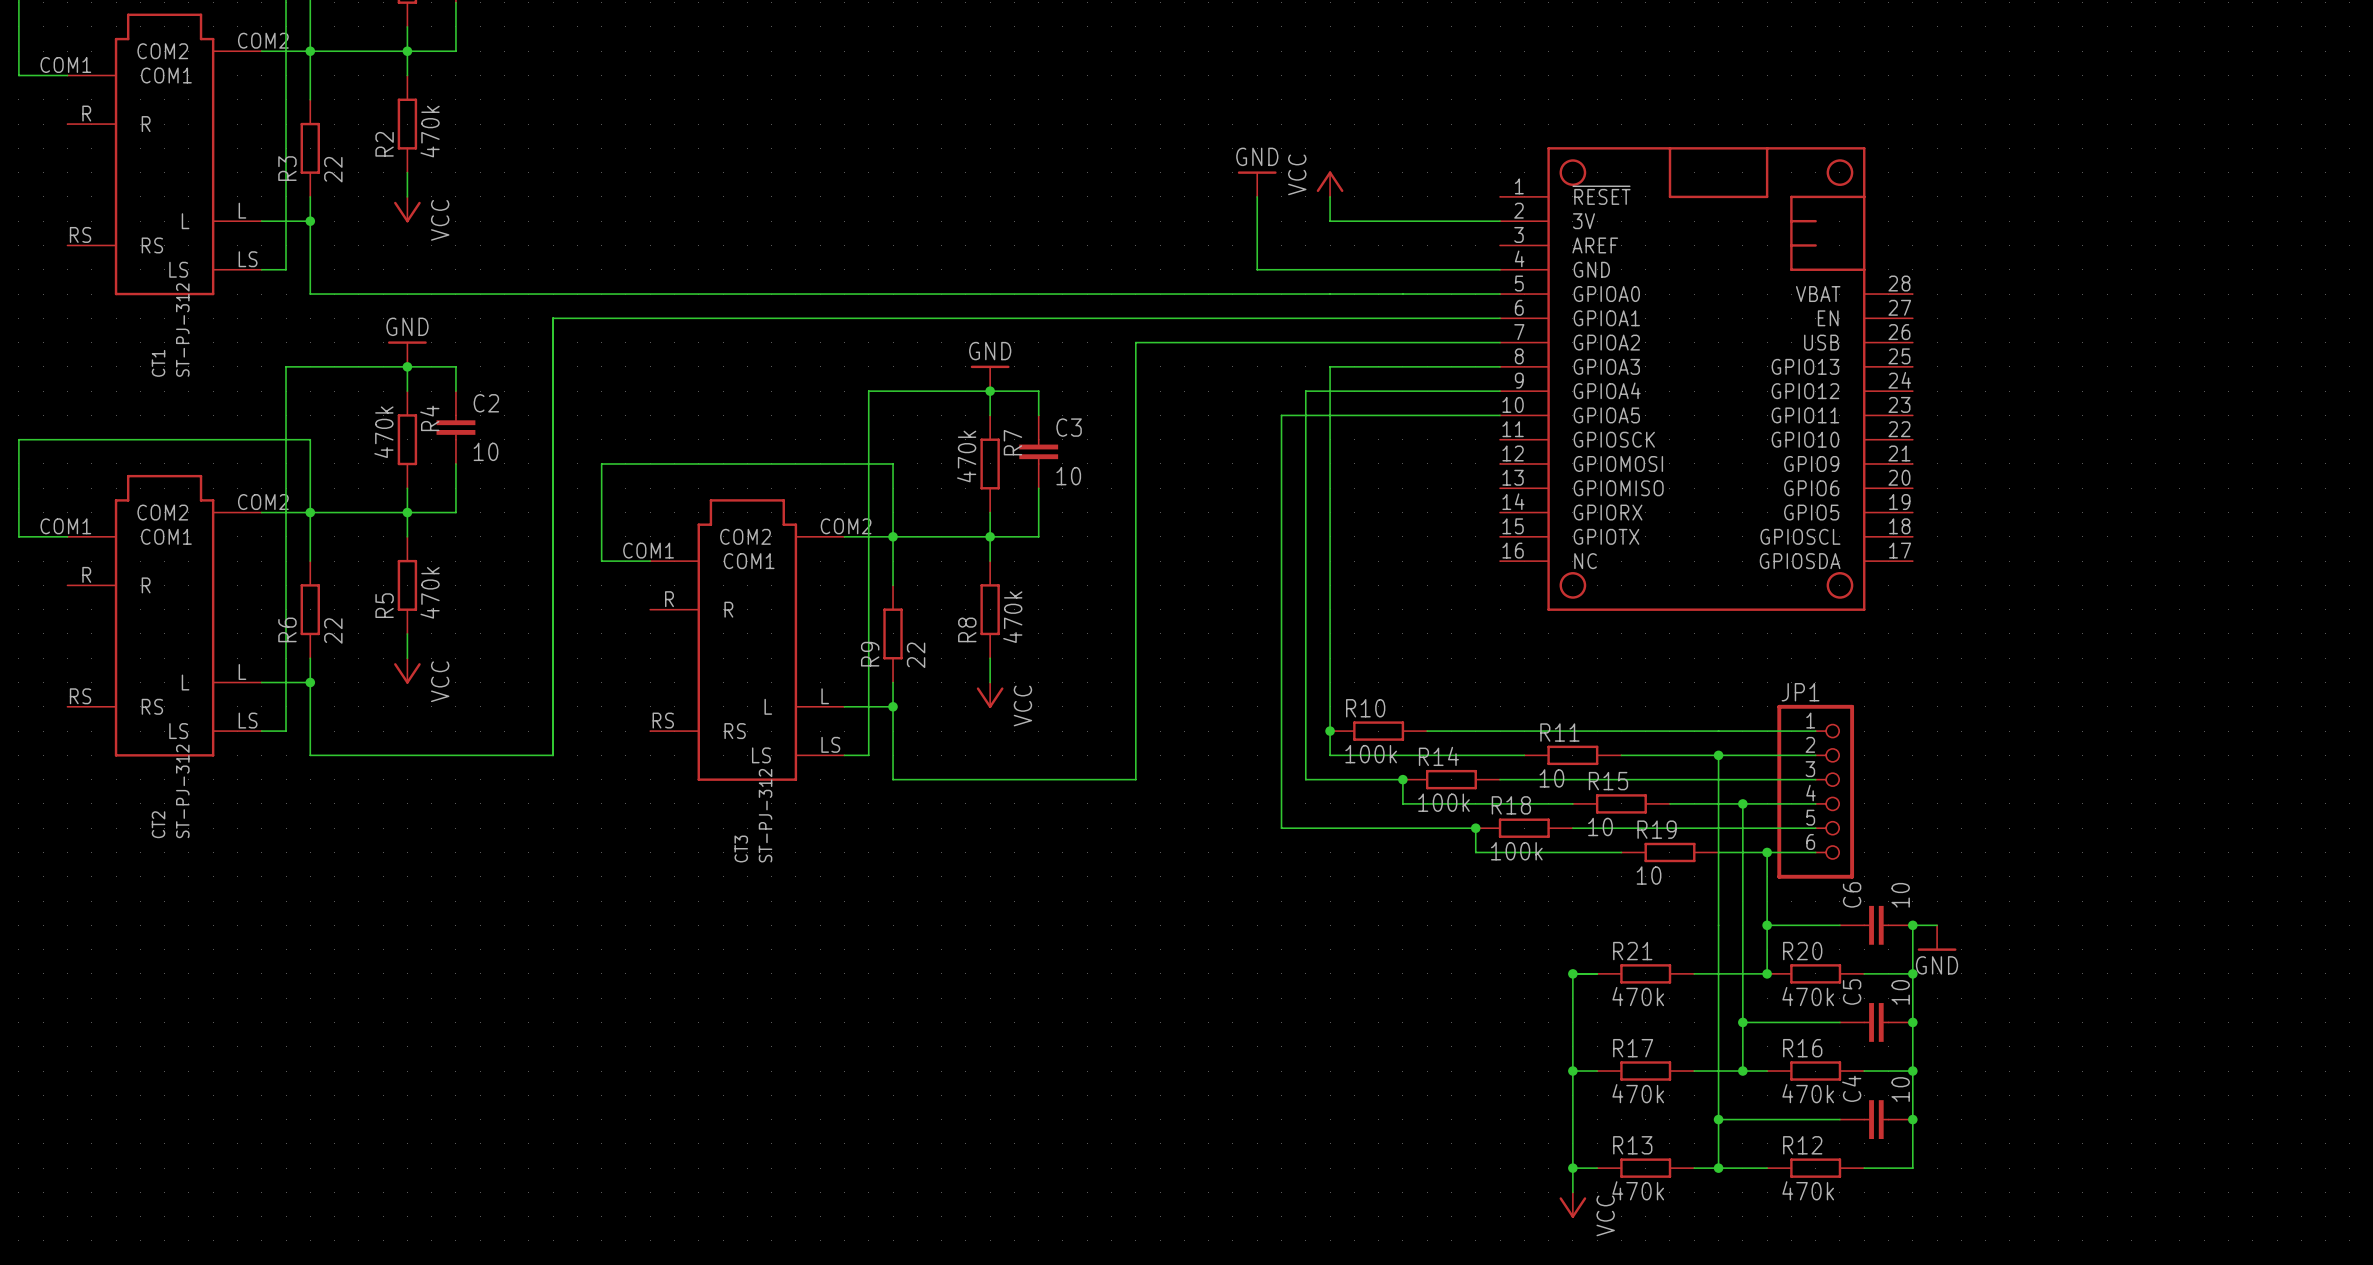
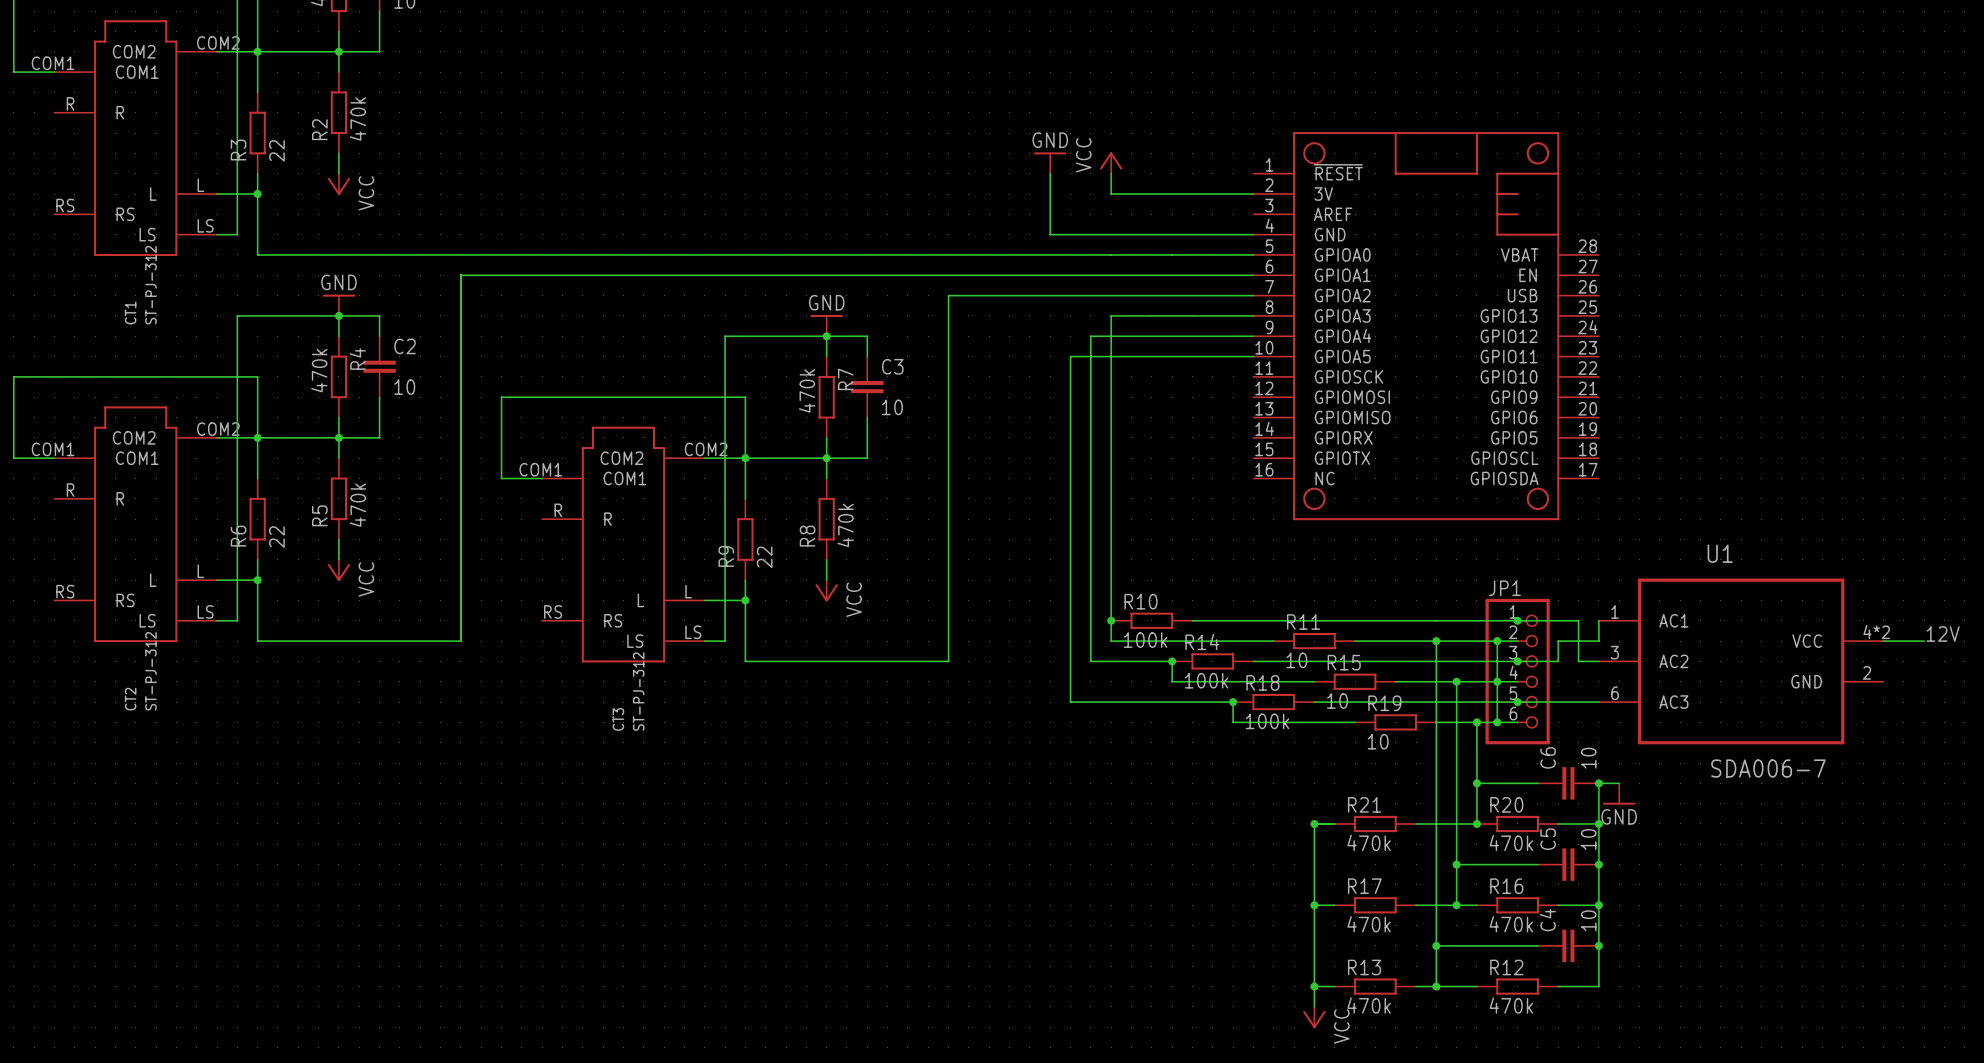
wire: none -> (1517, 620) (1578, 620) (1578, 661) (1598, 661)
junction: none -> (1517, 620)
wire: none -> (1598, 620) (1598, 641) (1558, 641) (1558, 661) (1517, 661)
label: none -> 12V (1943, 633)
wire: none -> (1497, 641) (1497, 722)
junction: none -> (1497, 641)
wire: none -> (1883, 641) (1924, 641)
junction: none -> (1517, 661)
U1: none -> SDA006-7 (1741, 661)
junction: none -> (1497, 681)
wire: none -> (1517, 702) (1598, 702)
junction: none -> (1517, 702)
junction: none -> (1497, 722)

